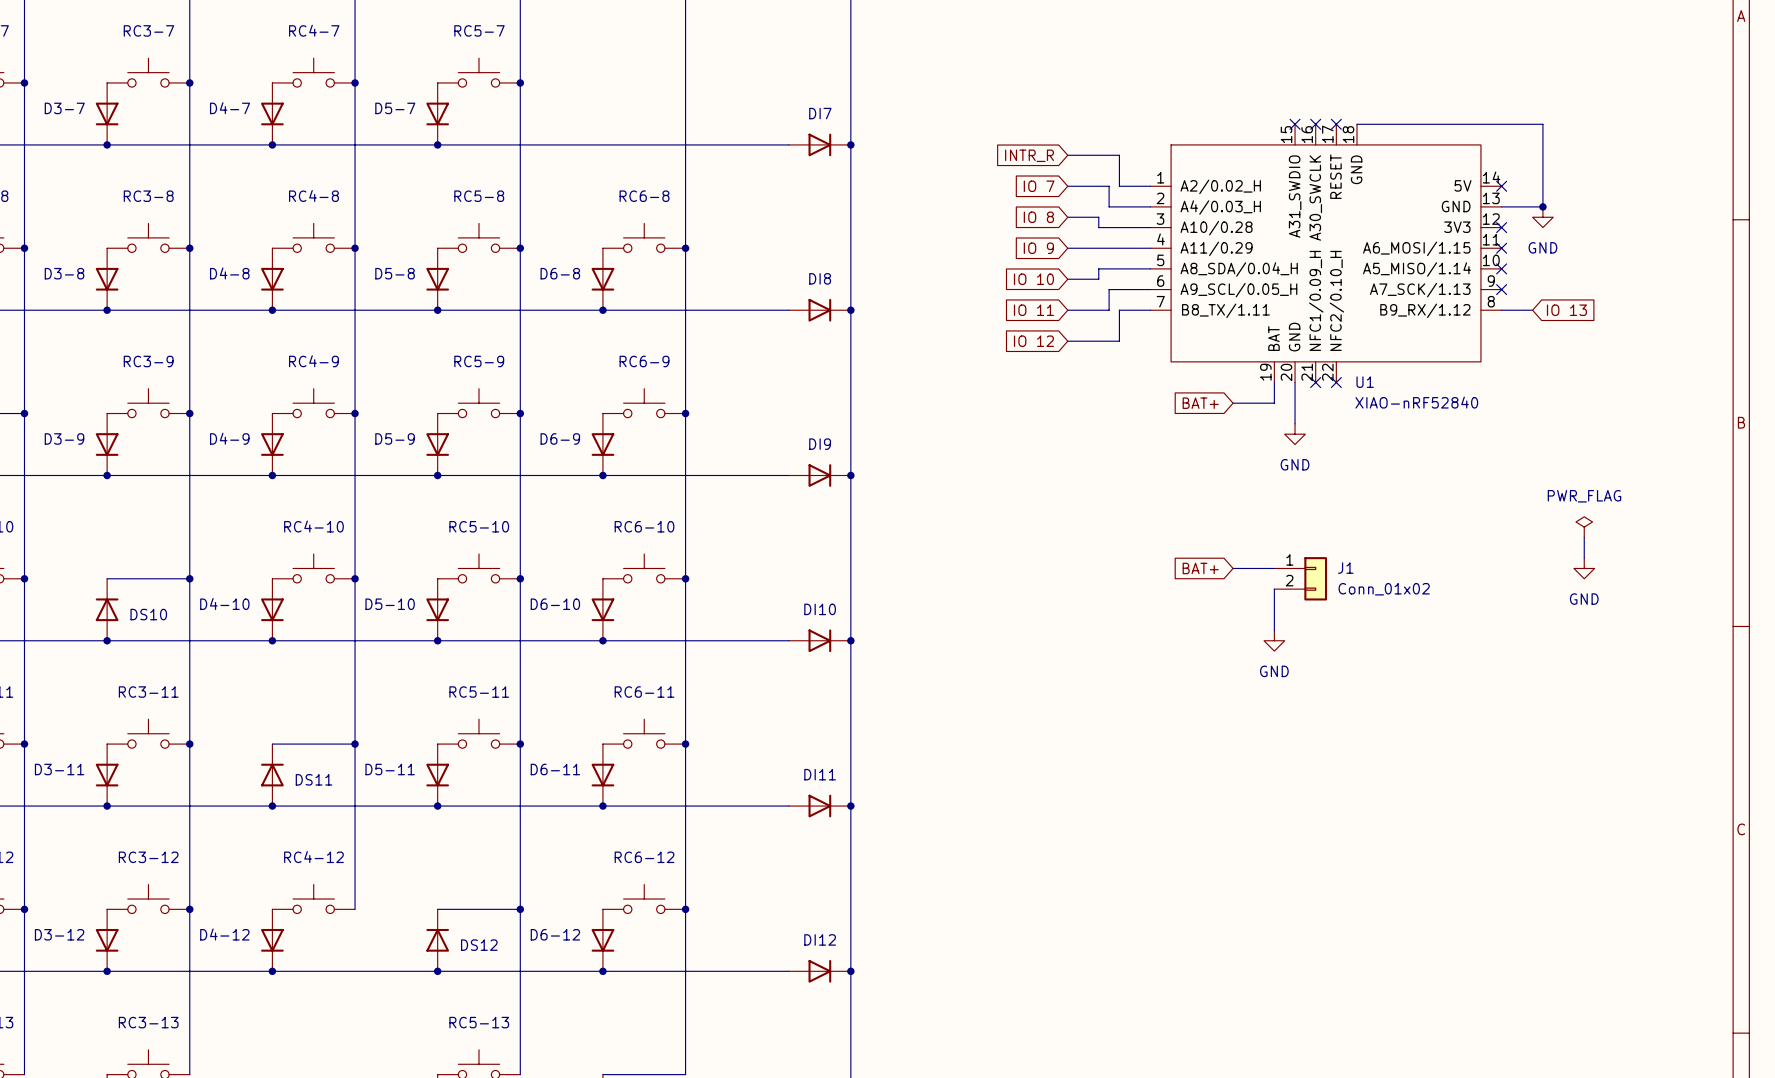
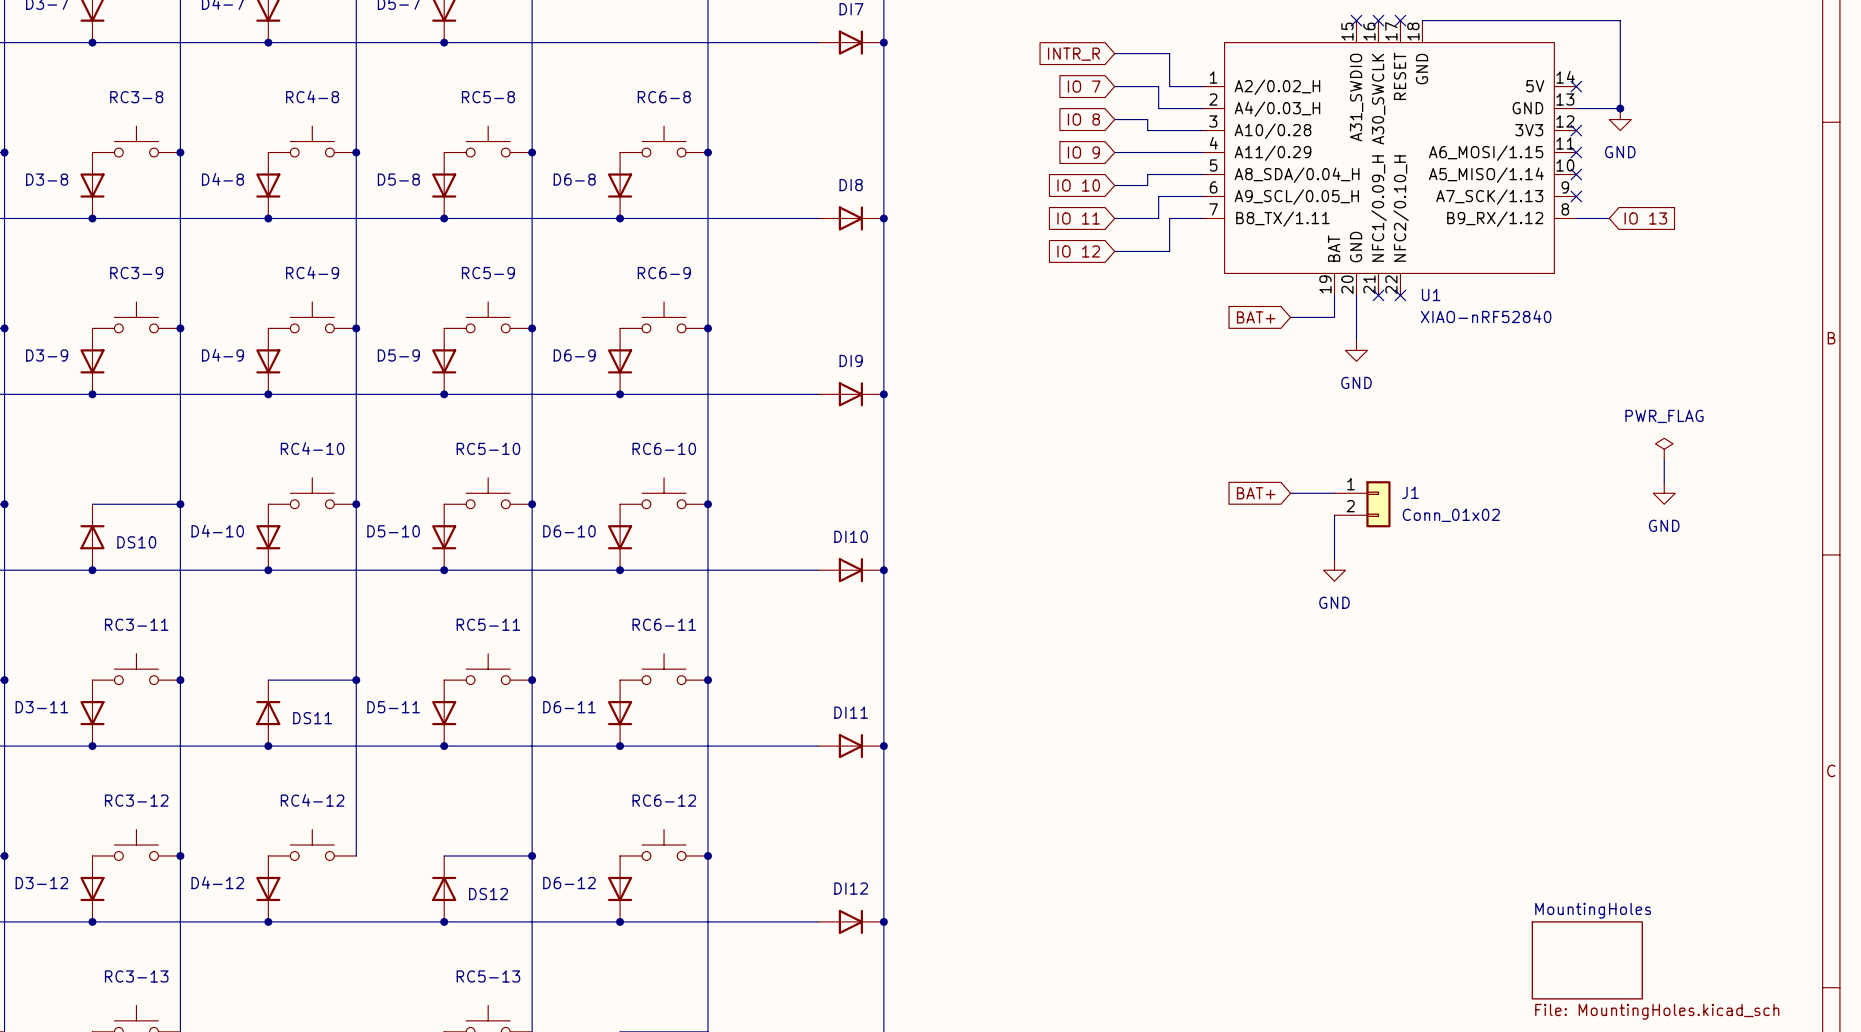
sheet MountingHoles: none -> File: MountingHoles.kicad_sch (1587, 960)

